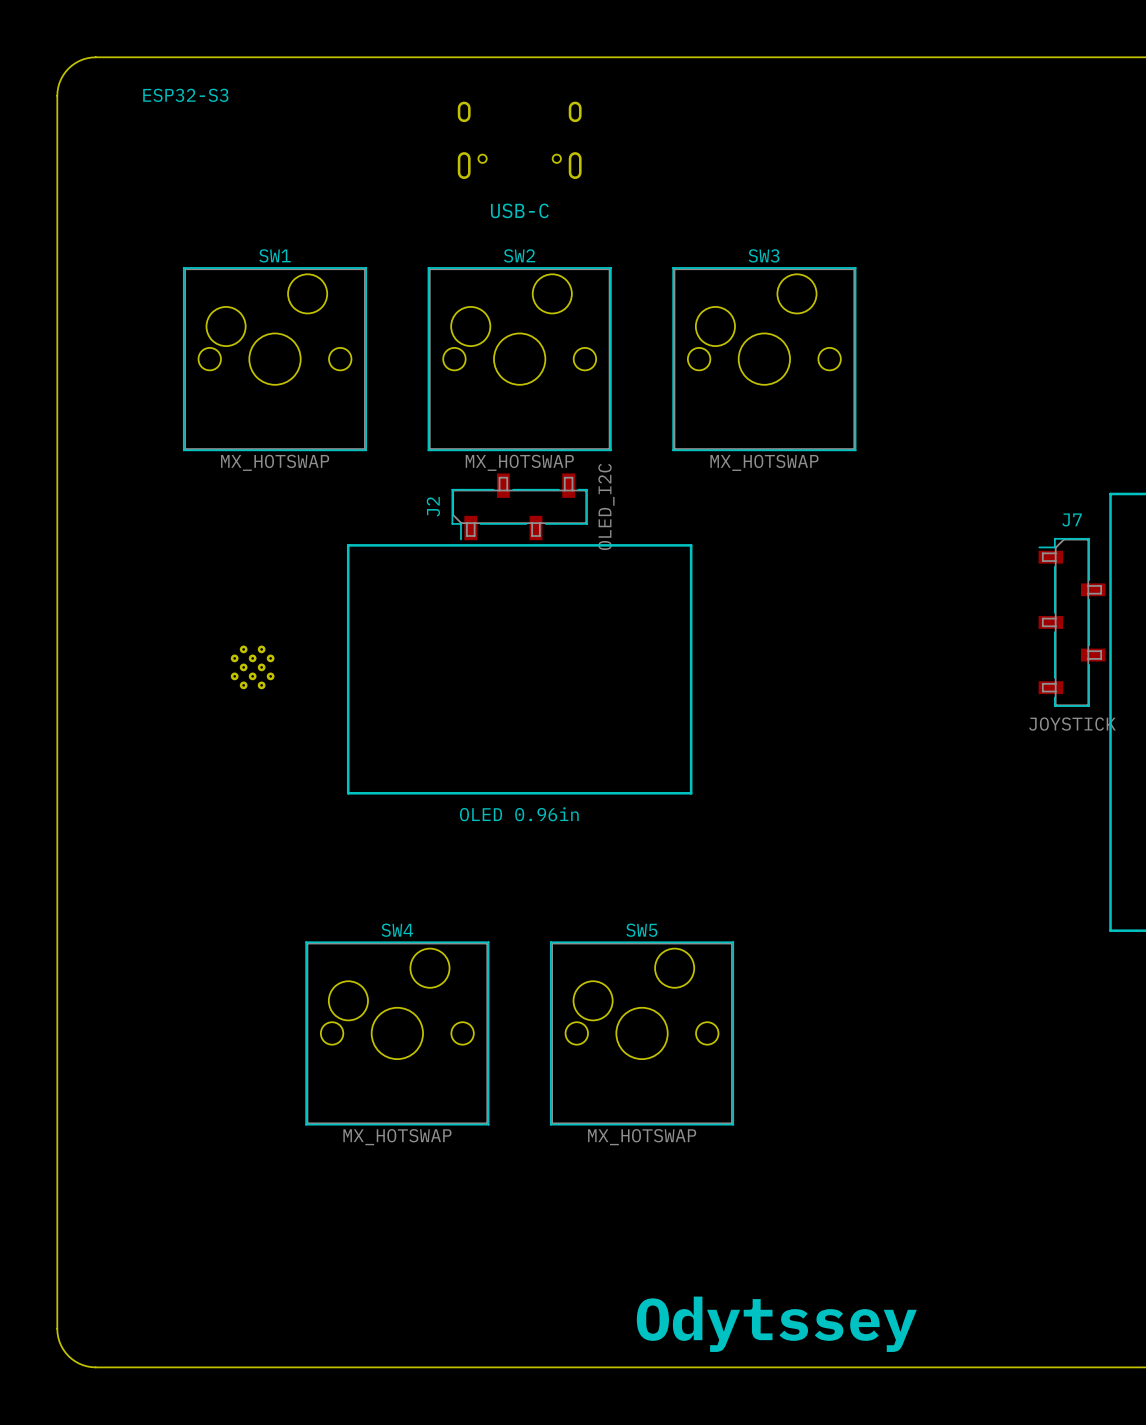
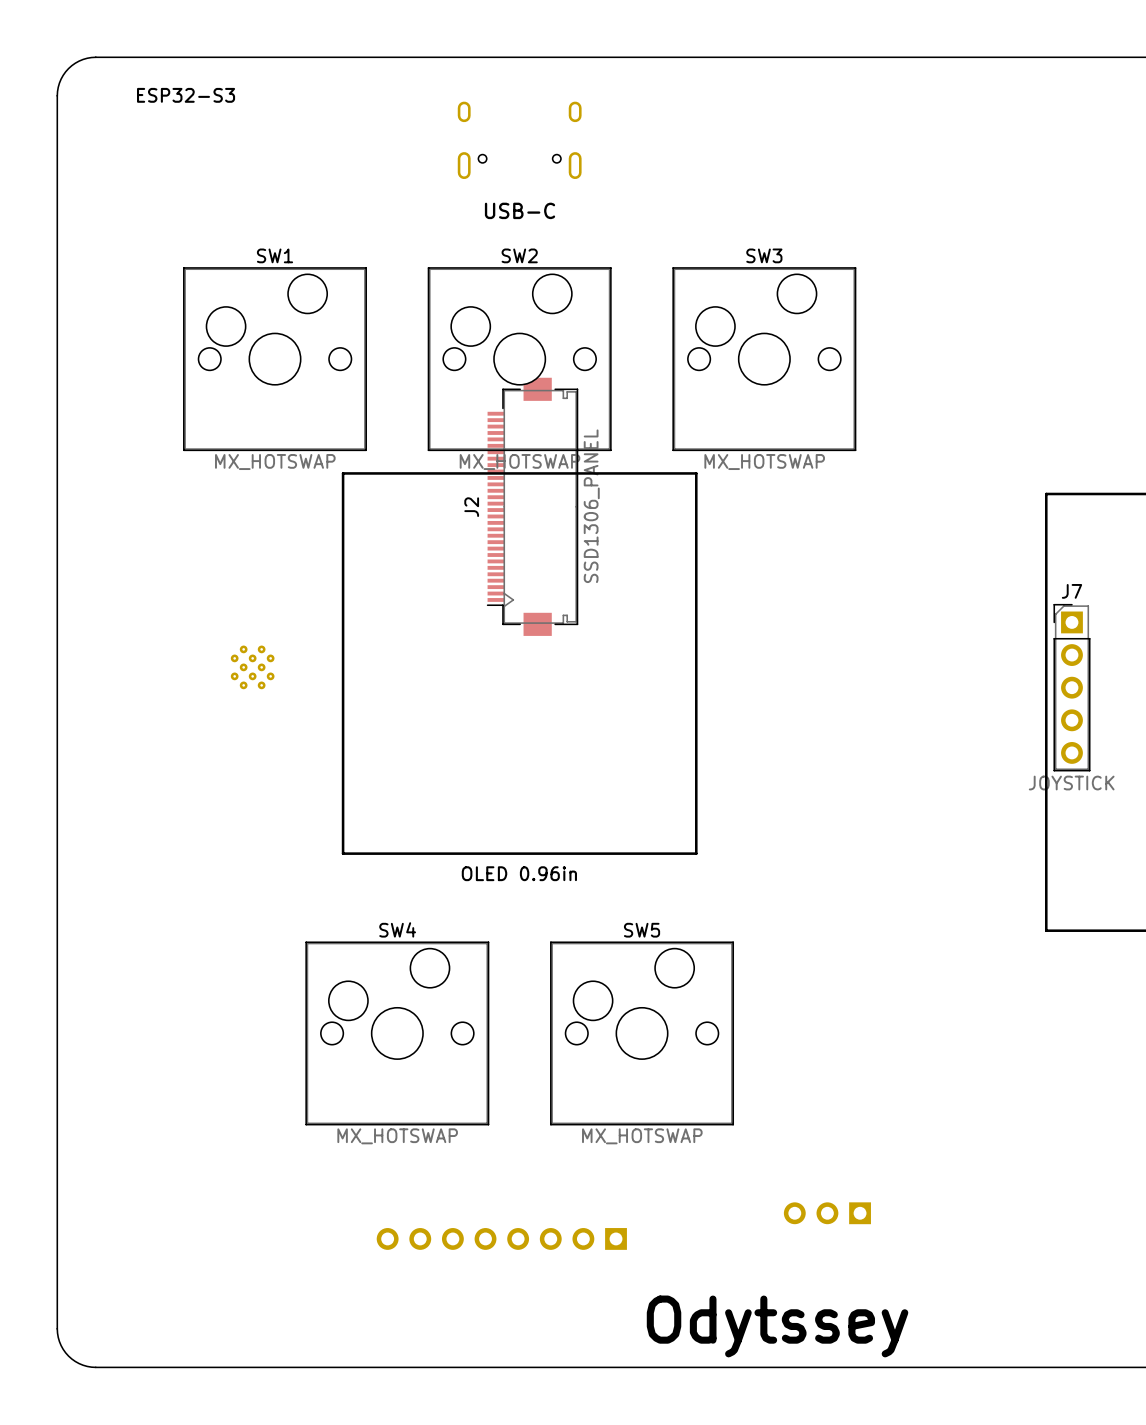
J2 footprint: [451, 473, 588, 541] -> [486, 377, 579, 636]
line: (1110, 493) (1110, 930) -> (1110, 493) (1046, 493) (1046, 930) (1110, 930)
J2 value: OLED_I2C (606, 506) -> SSD1306_PANEL (591, 506)
J7 footprint: [1038, 538, 1106, 707] -> [1053, 603, 1091, 772]
line: (348, 545) (691, 545) (691, 793) (348, 793) (348, 545) -> (343, 473) (343, 853) (696, 853) (696, 473) (343, 473)
text position: OLED 0.96in (519, 814) -> OLED 0.96in (519, 873)
part: none -> (827, 1213)
part: none -> (501, 1238)

